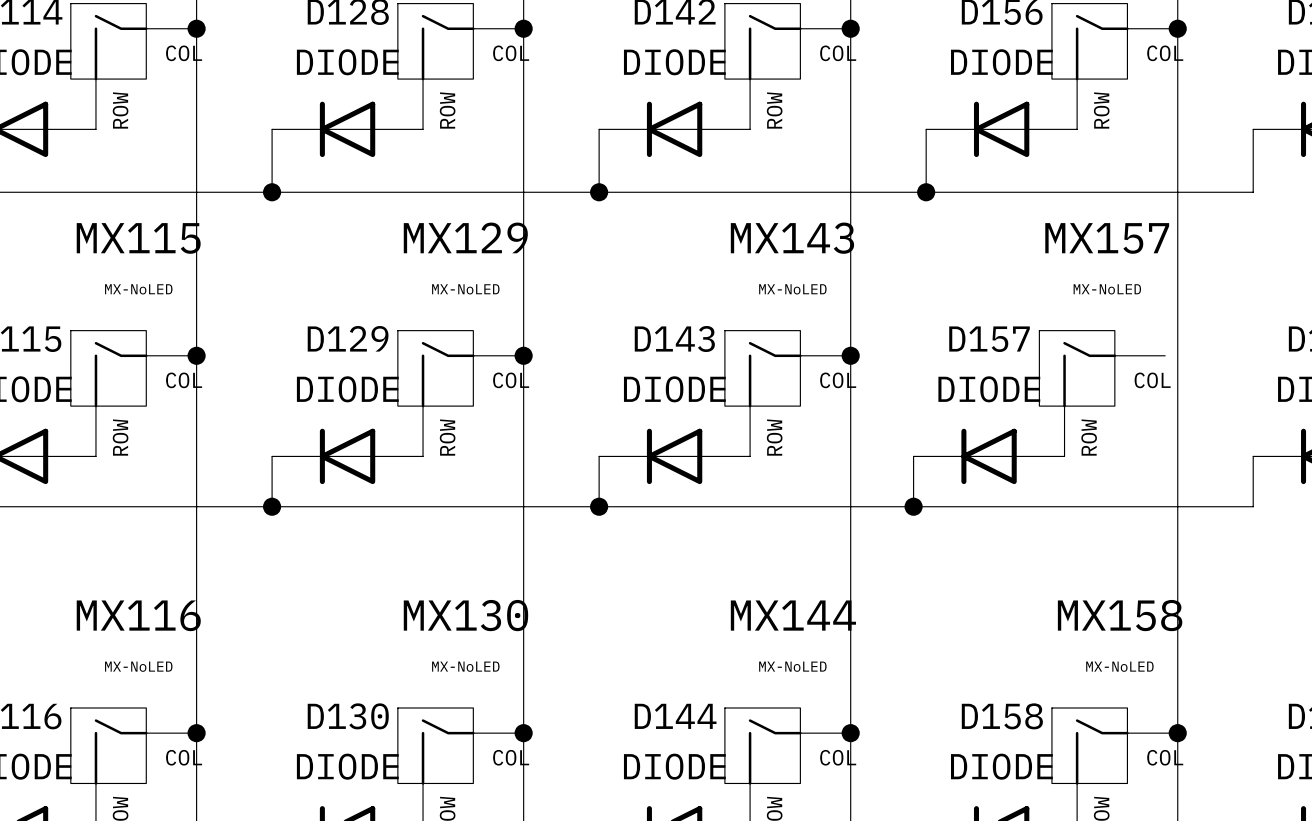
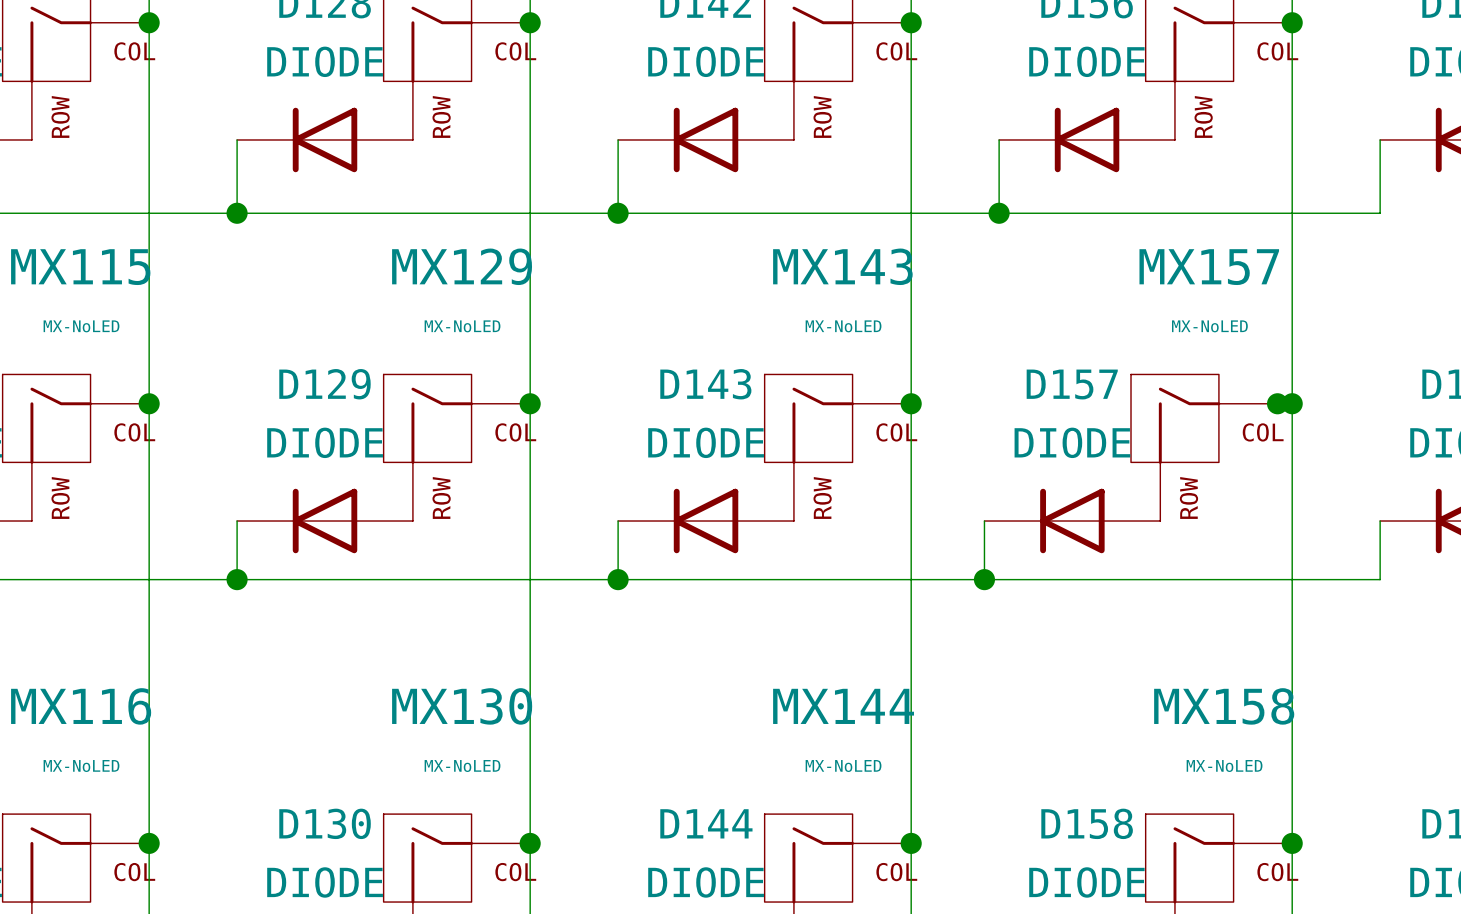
junction: none -> (1277, 403)
junction: none -> (1292, 403)

